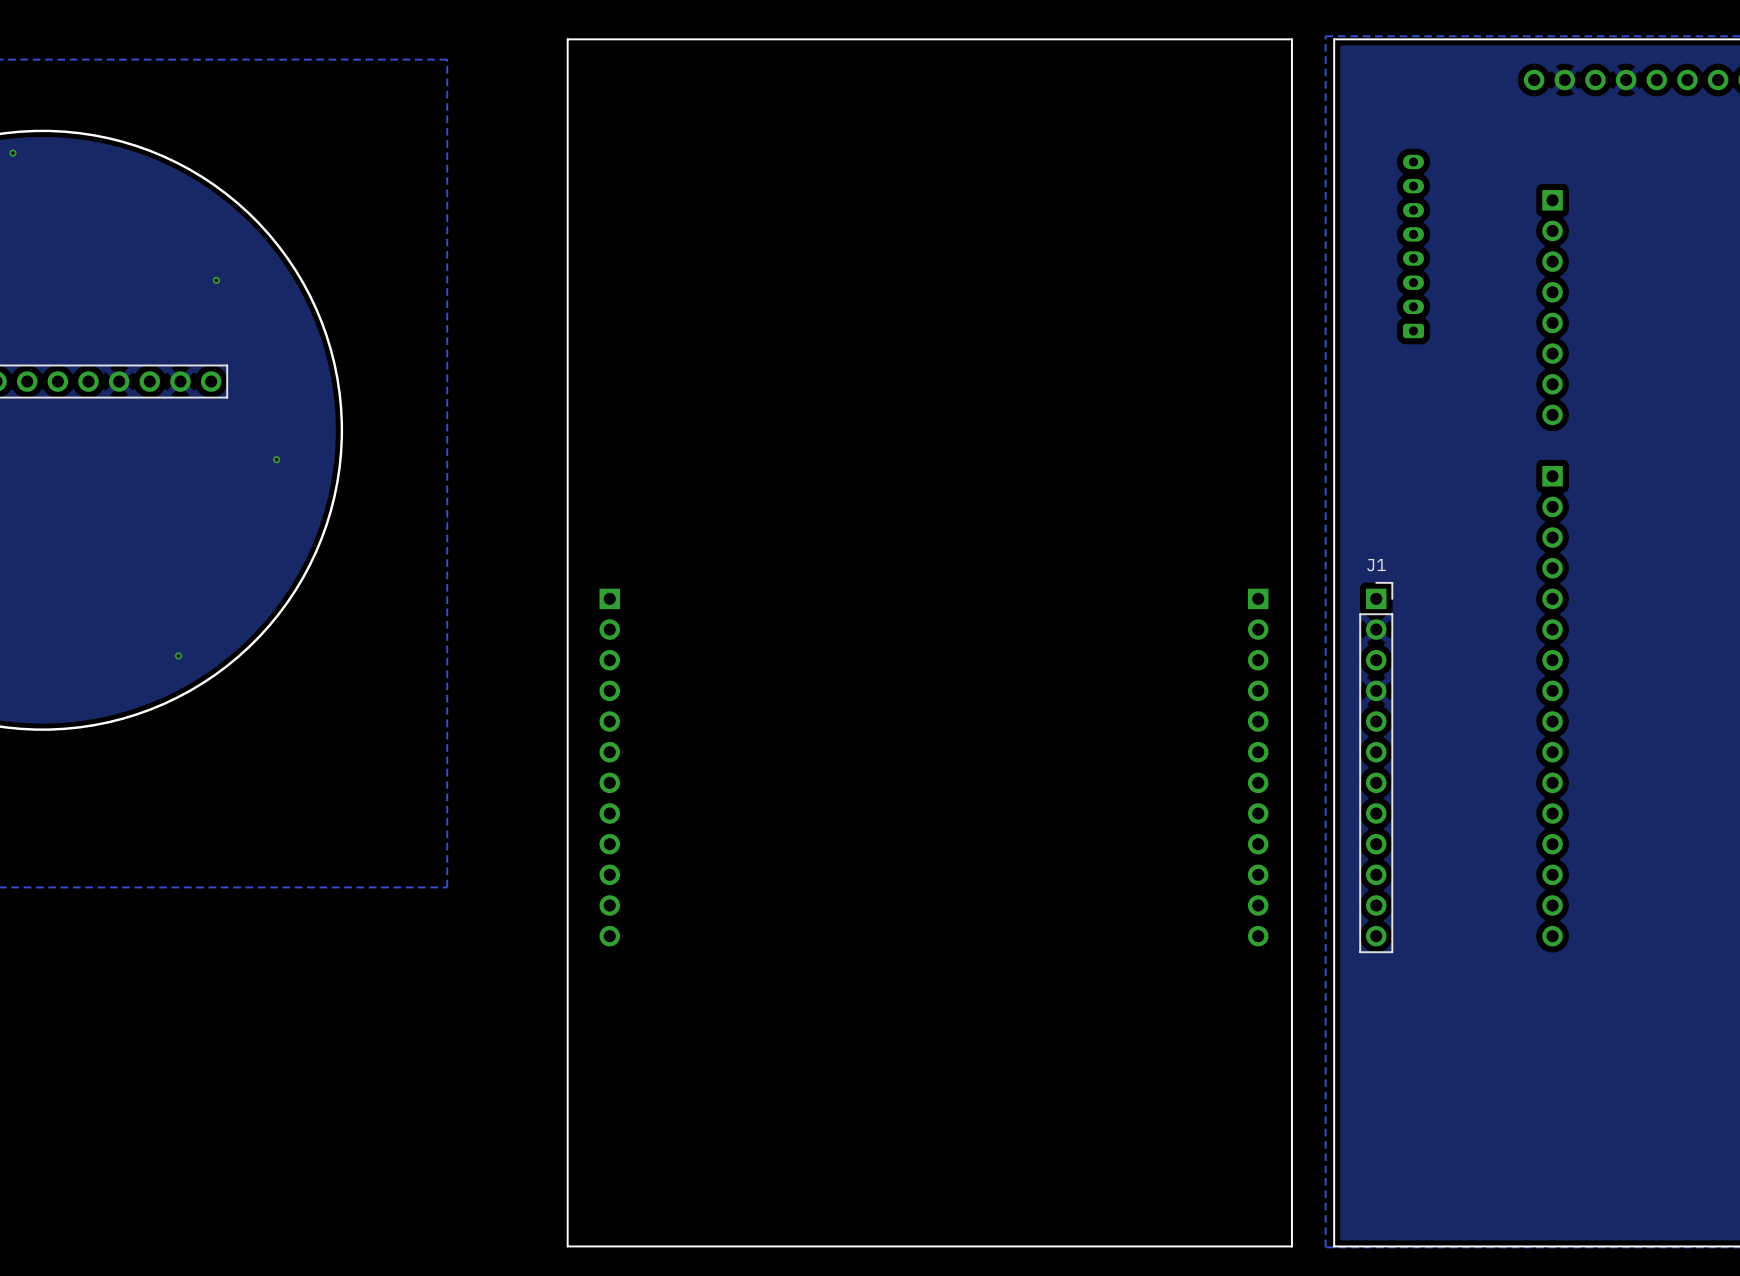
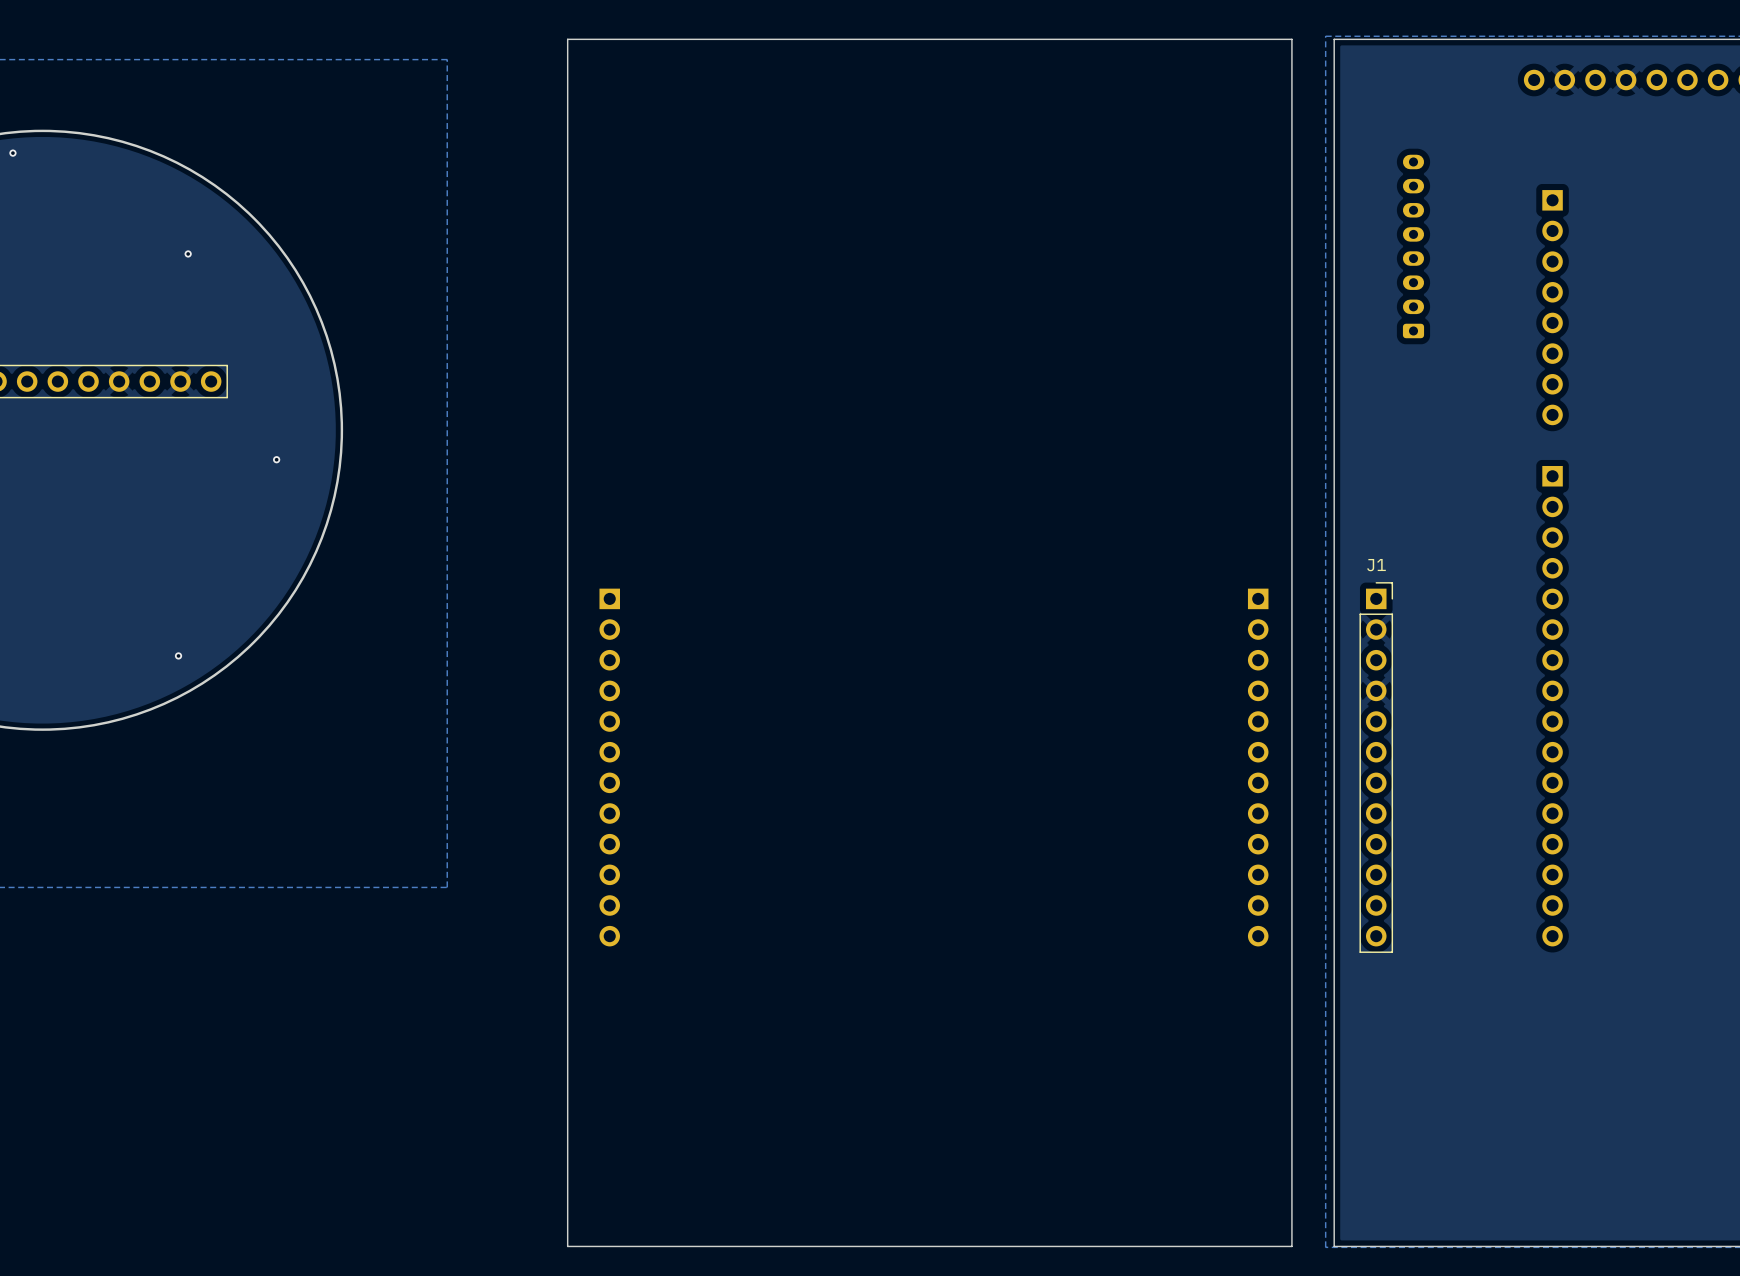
via position: (216, 280) -> (188, 253)

